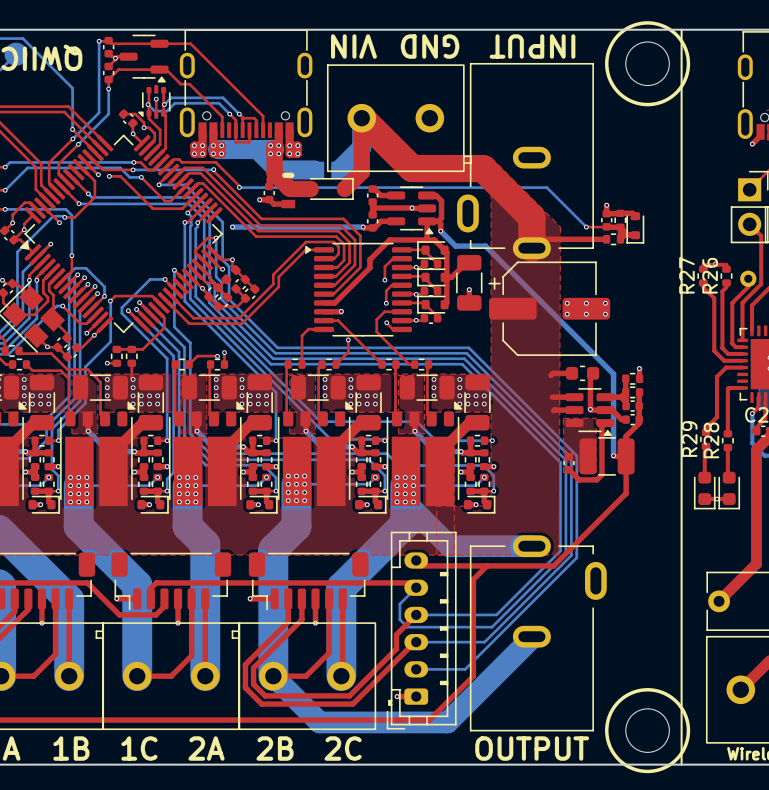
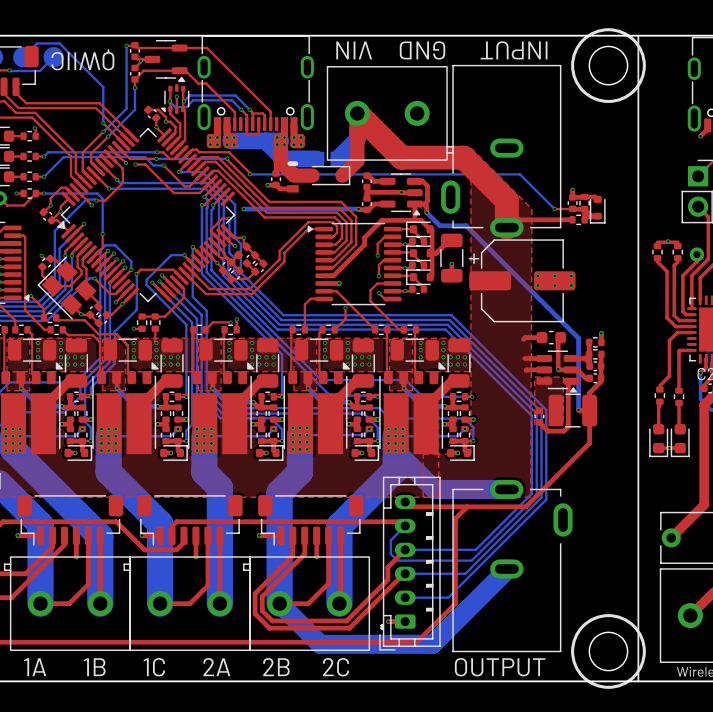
R27 name: R27 (686, 275) -> none
R26 name: R26 (710, 275) -> none
R29 name: R29 (689, 439) -> none
R28 name: R28 (711, 440) -> none

